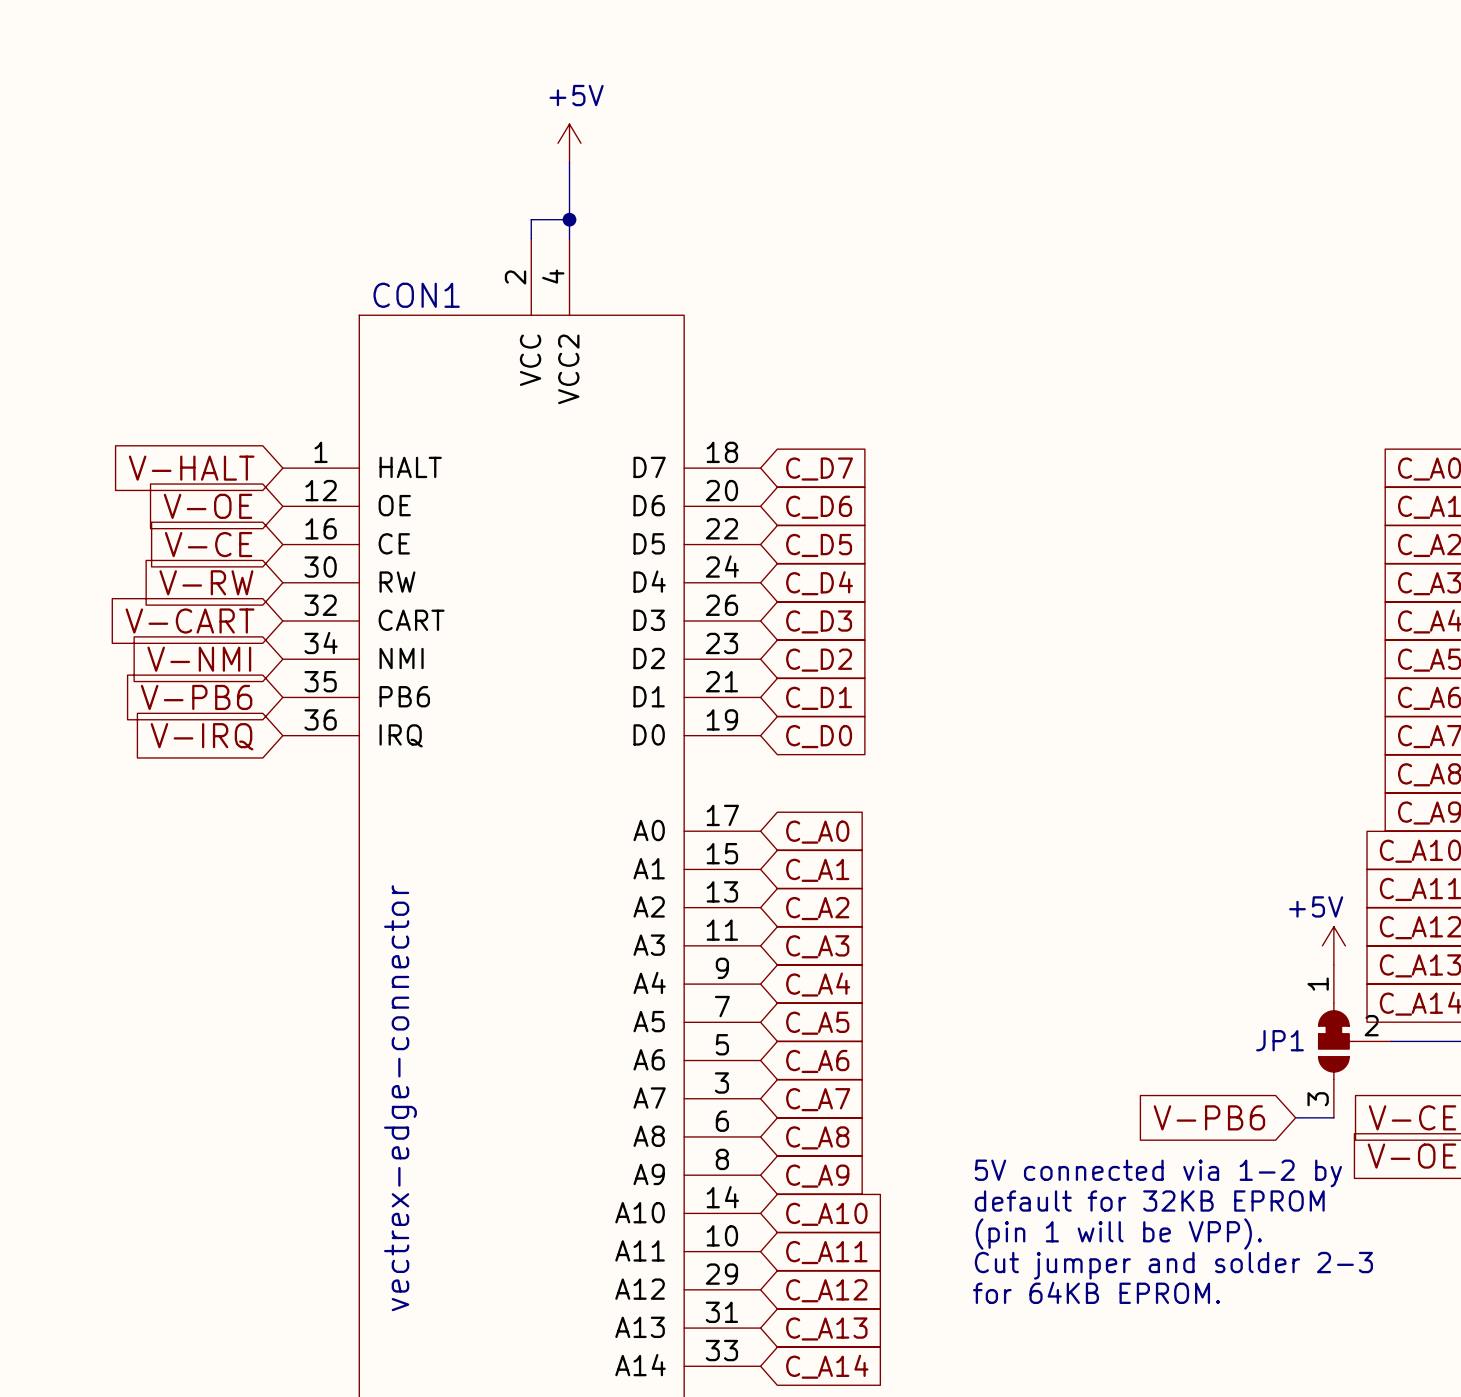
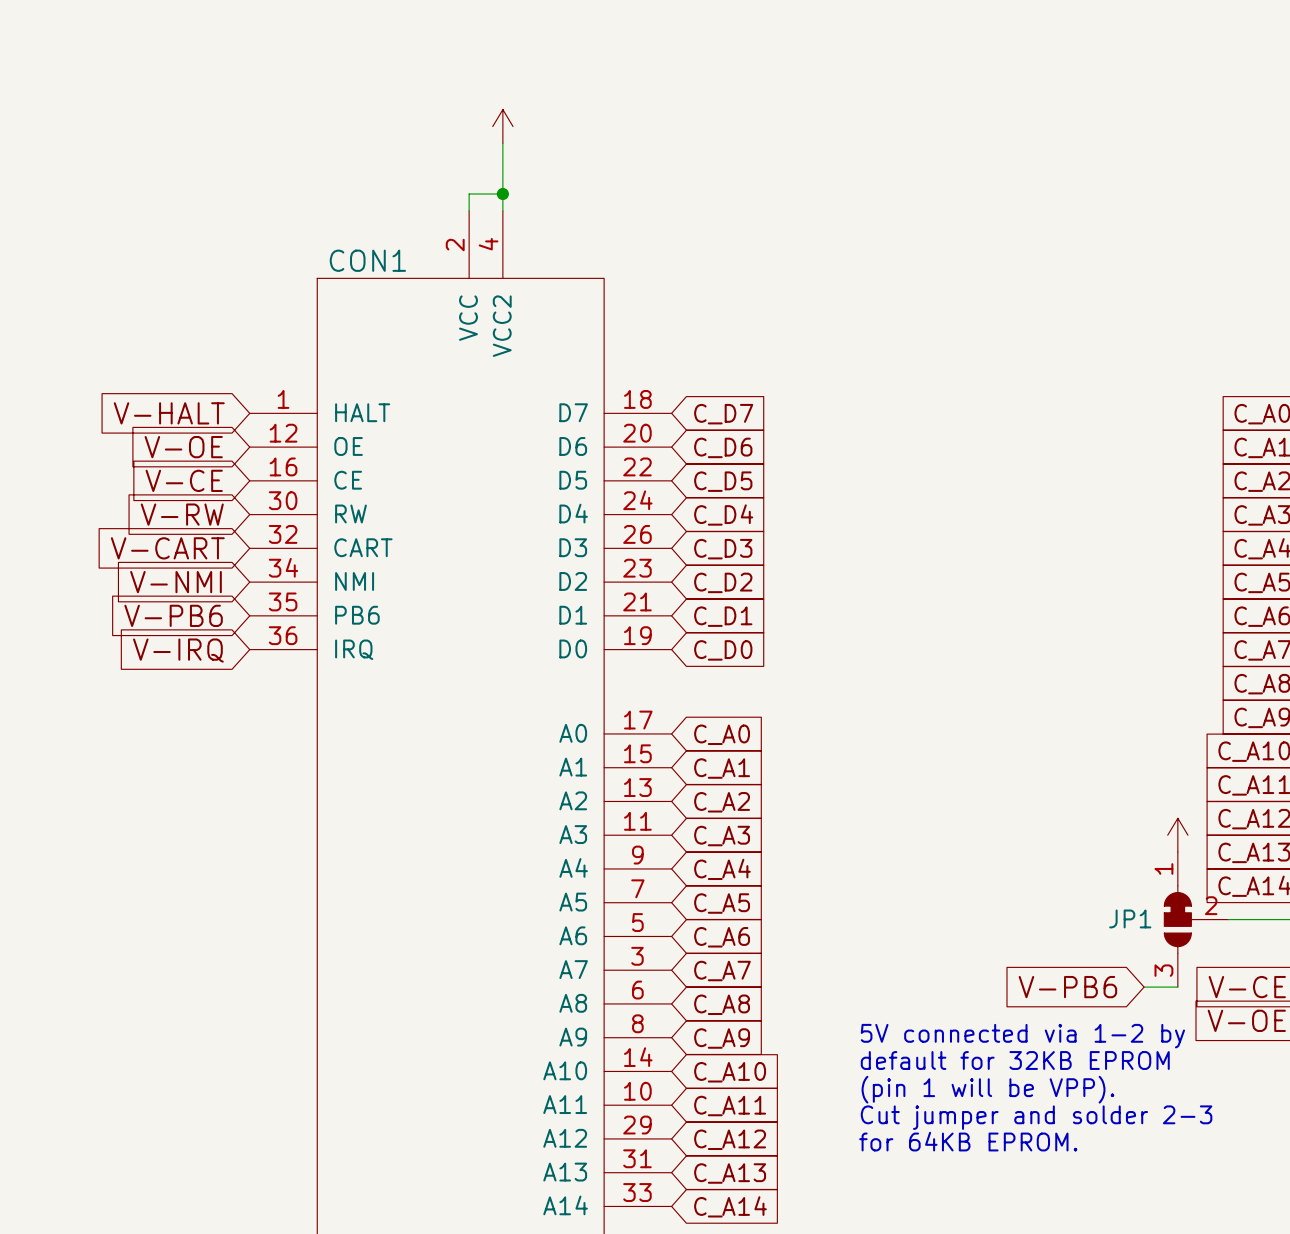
power symbol text: +5V (576, 95) -> none
power symbol text: +5V (1316, 906) -> none
CON1 value: vectrex-edge-connector (400, 1098) -> none

